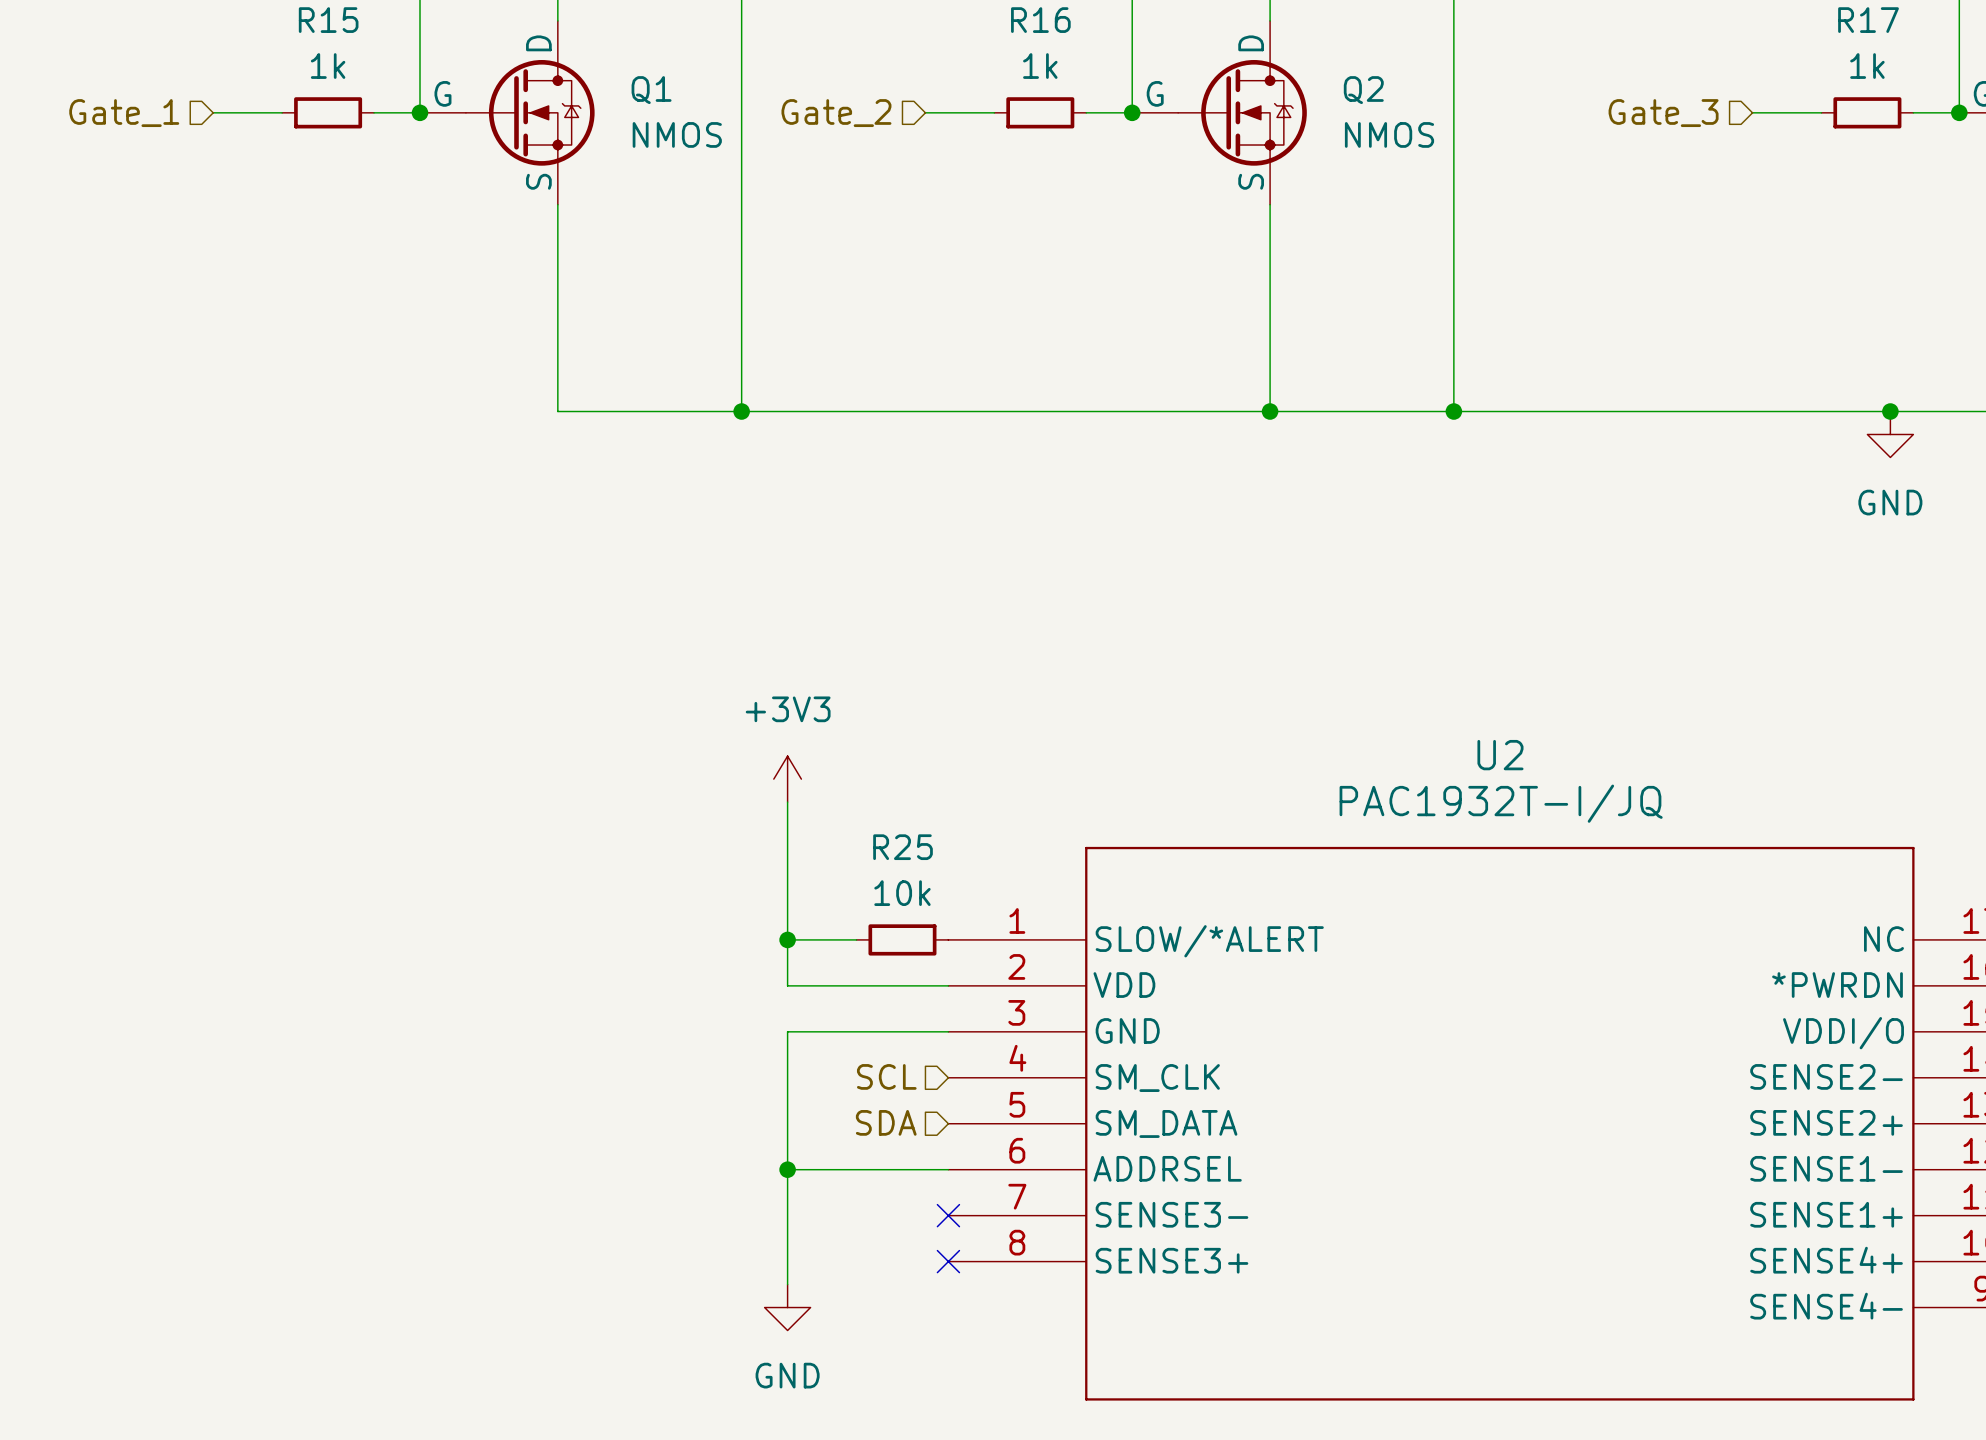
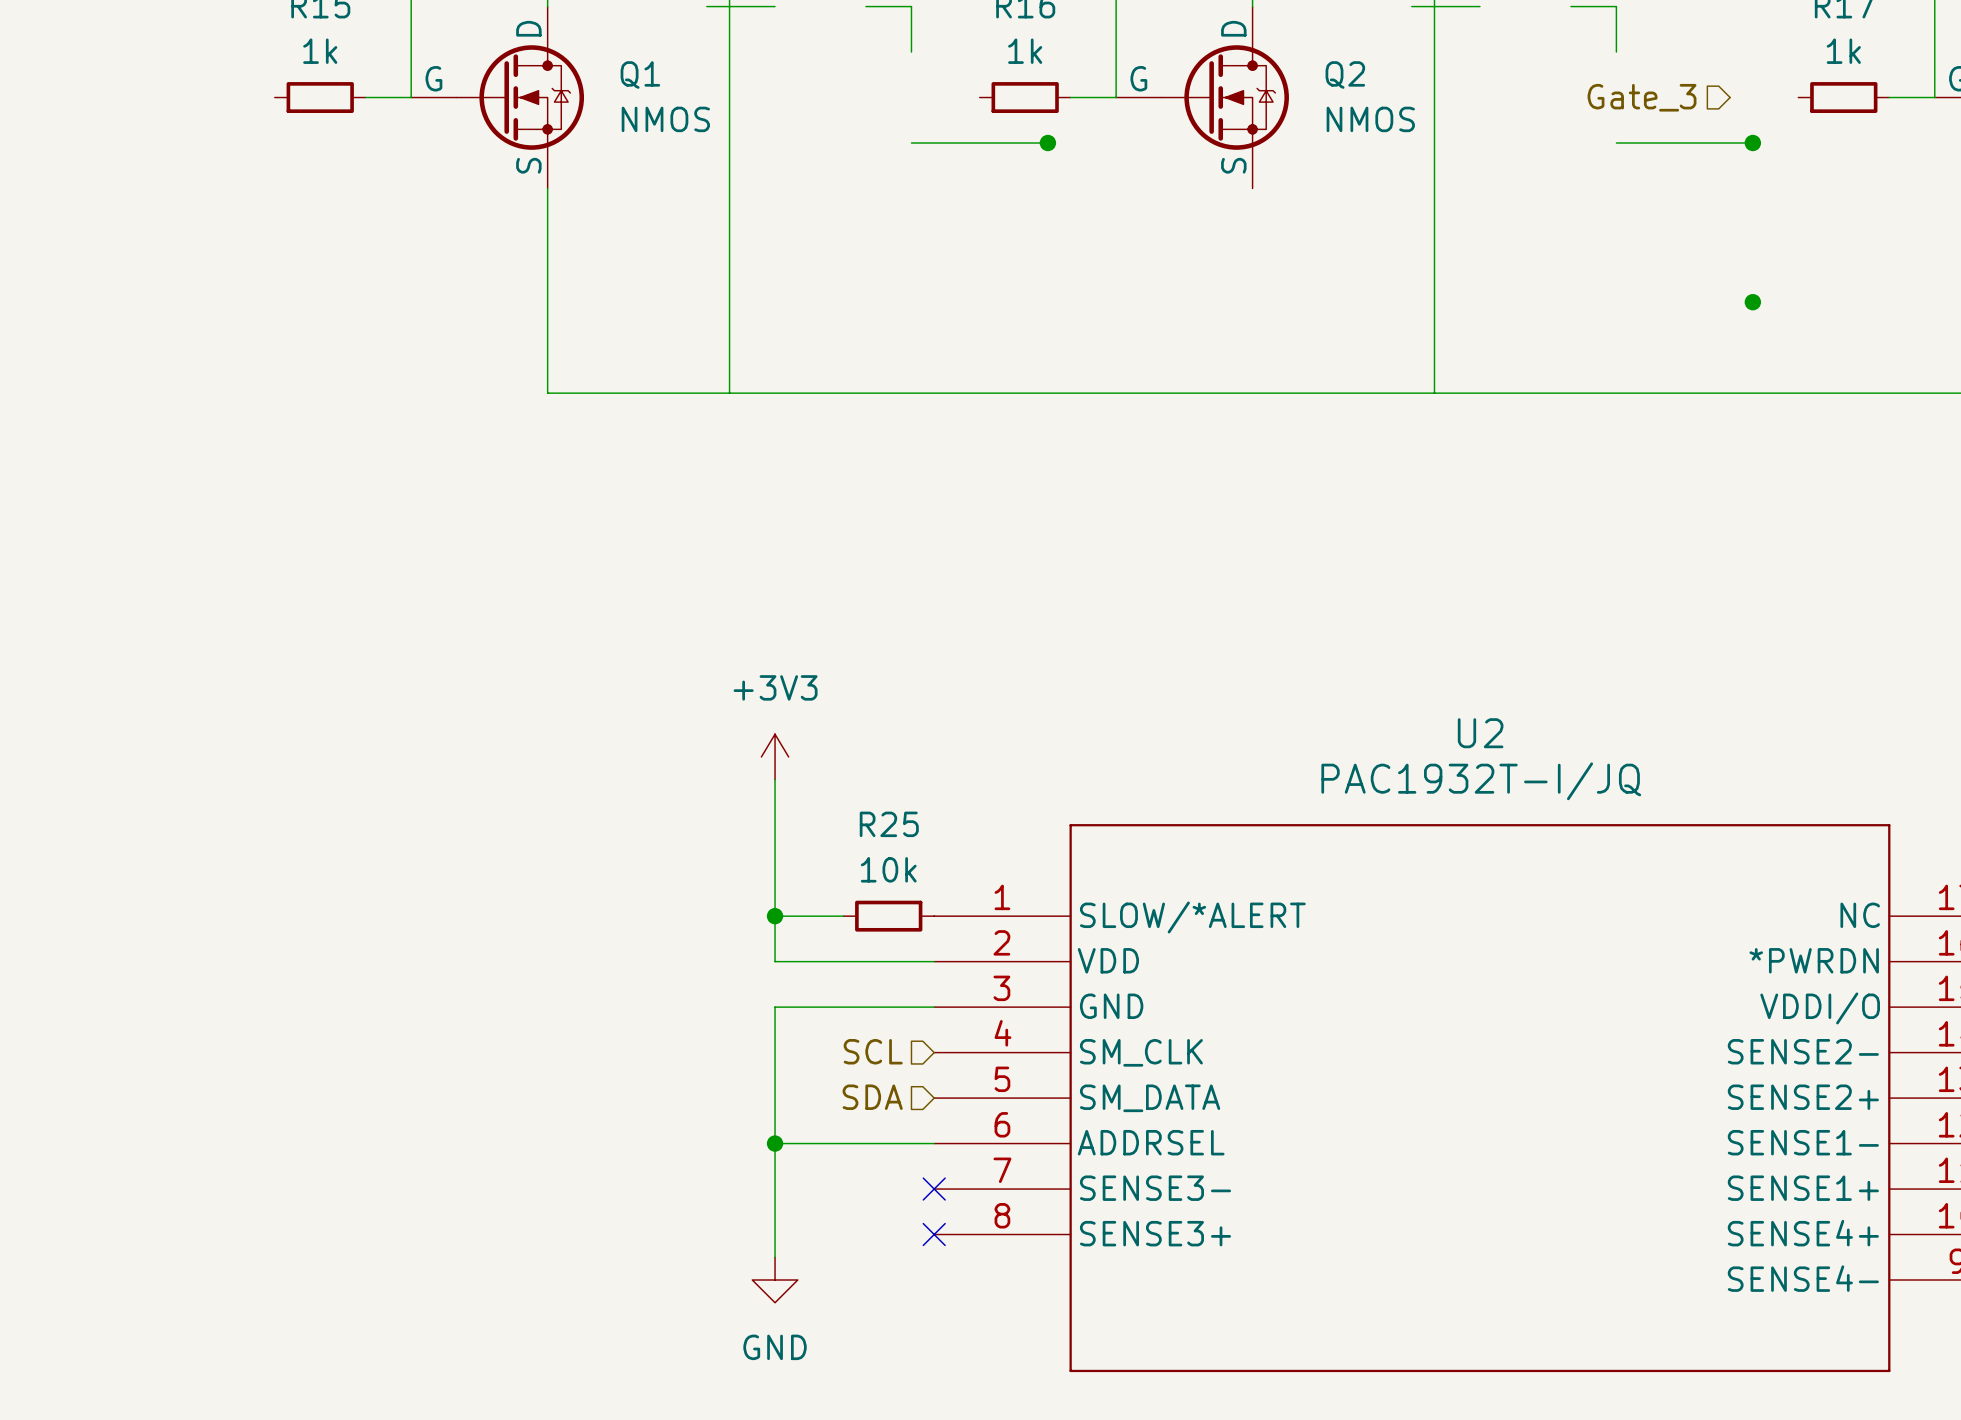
wire: none -> (865, 6) (911, 6) (911, 52)
wire: none -> (1570, 6) (1616, 6) (1616, 52)
wire: (213, 112) (282, 112) -> none
junction: (419, 112) -> none
wire: (925, 112) (994, 112) -> (706, 6) (775, 6)
junction position: (1132, 112) -> (1047, 143)
wire: (1752, 112) (1821, 112) -> (1411, 6) (1479, 6)
junction: (1959, 112) -> none
hierarchical label: Gate_1 (124, 113) -> none
hierarchical label: Gate_2 (836, 113) -> none
wire: none -> (911, 143) (1047, 143)
wire: none -> (1616, 143) (1752, 143)
junction: none -> (1752, 143)
wire: (1270, 204) (1270, 411) -> none
junction: none -> (1752, 302)
junction: (741, 411) -> none
junction: (1270, 411) -> none
junction: (1453, 411) -> none
junction: (1890, 411) -> none
power symbol: GND (1890, 434) -> none

